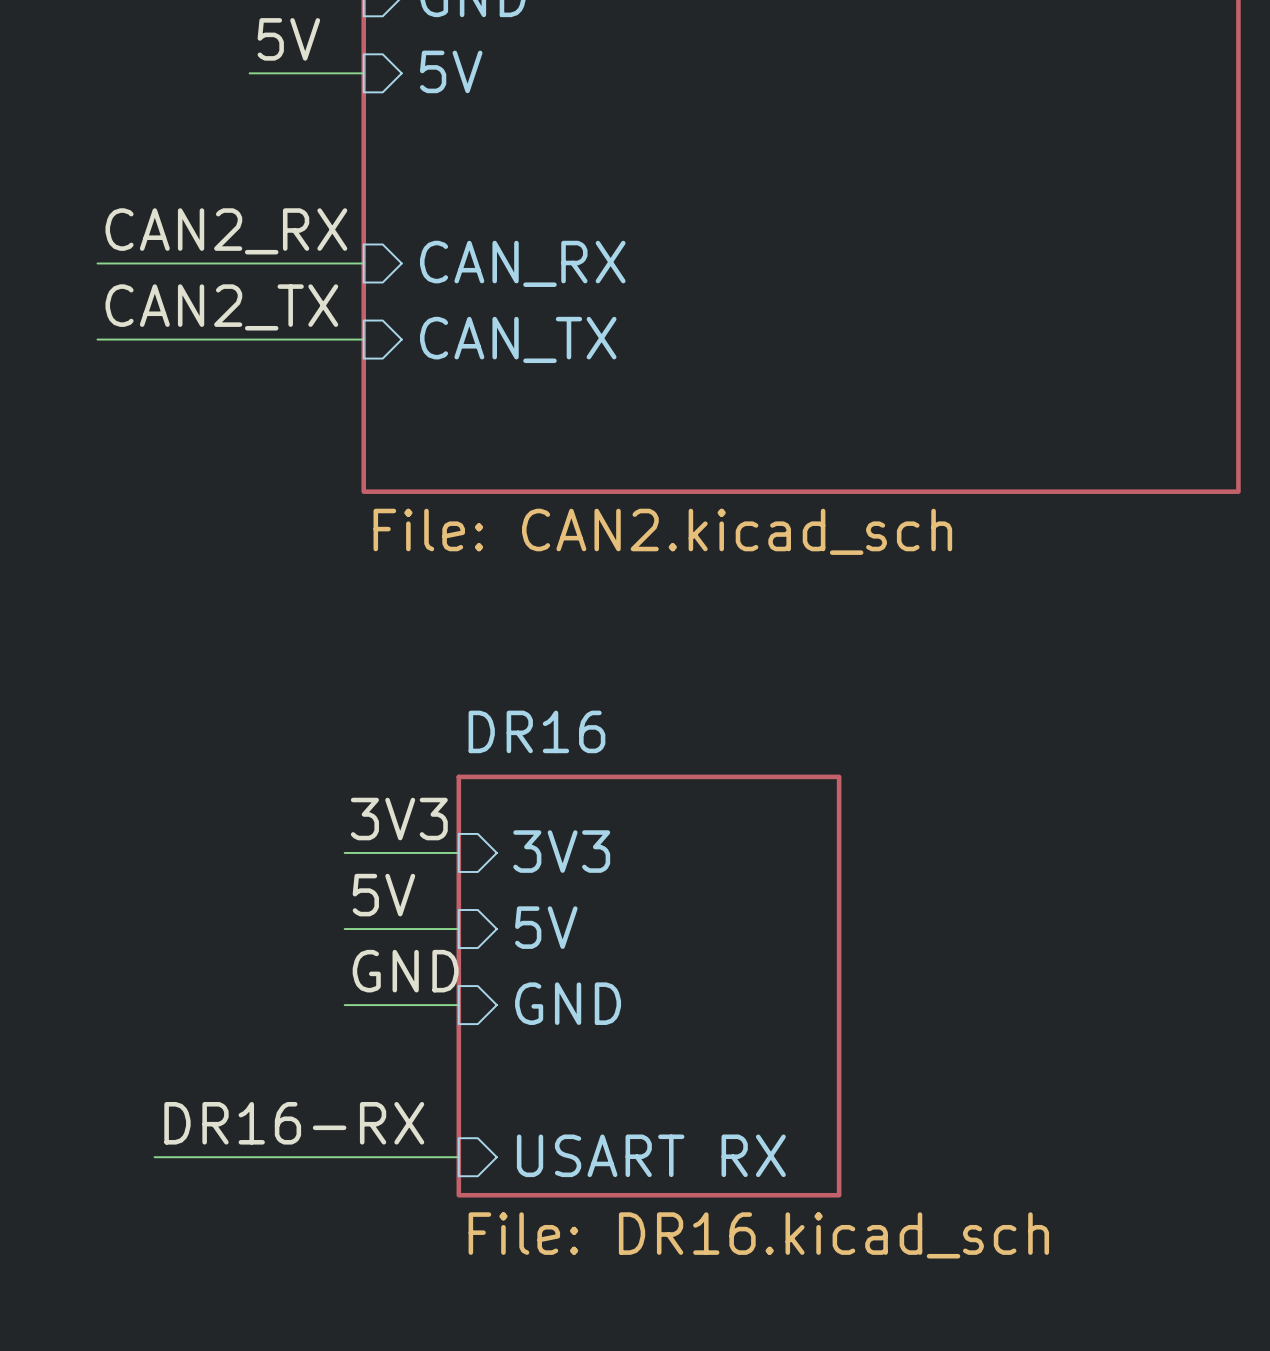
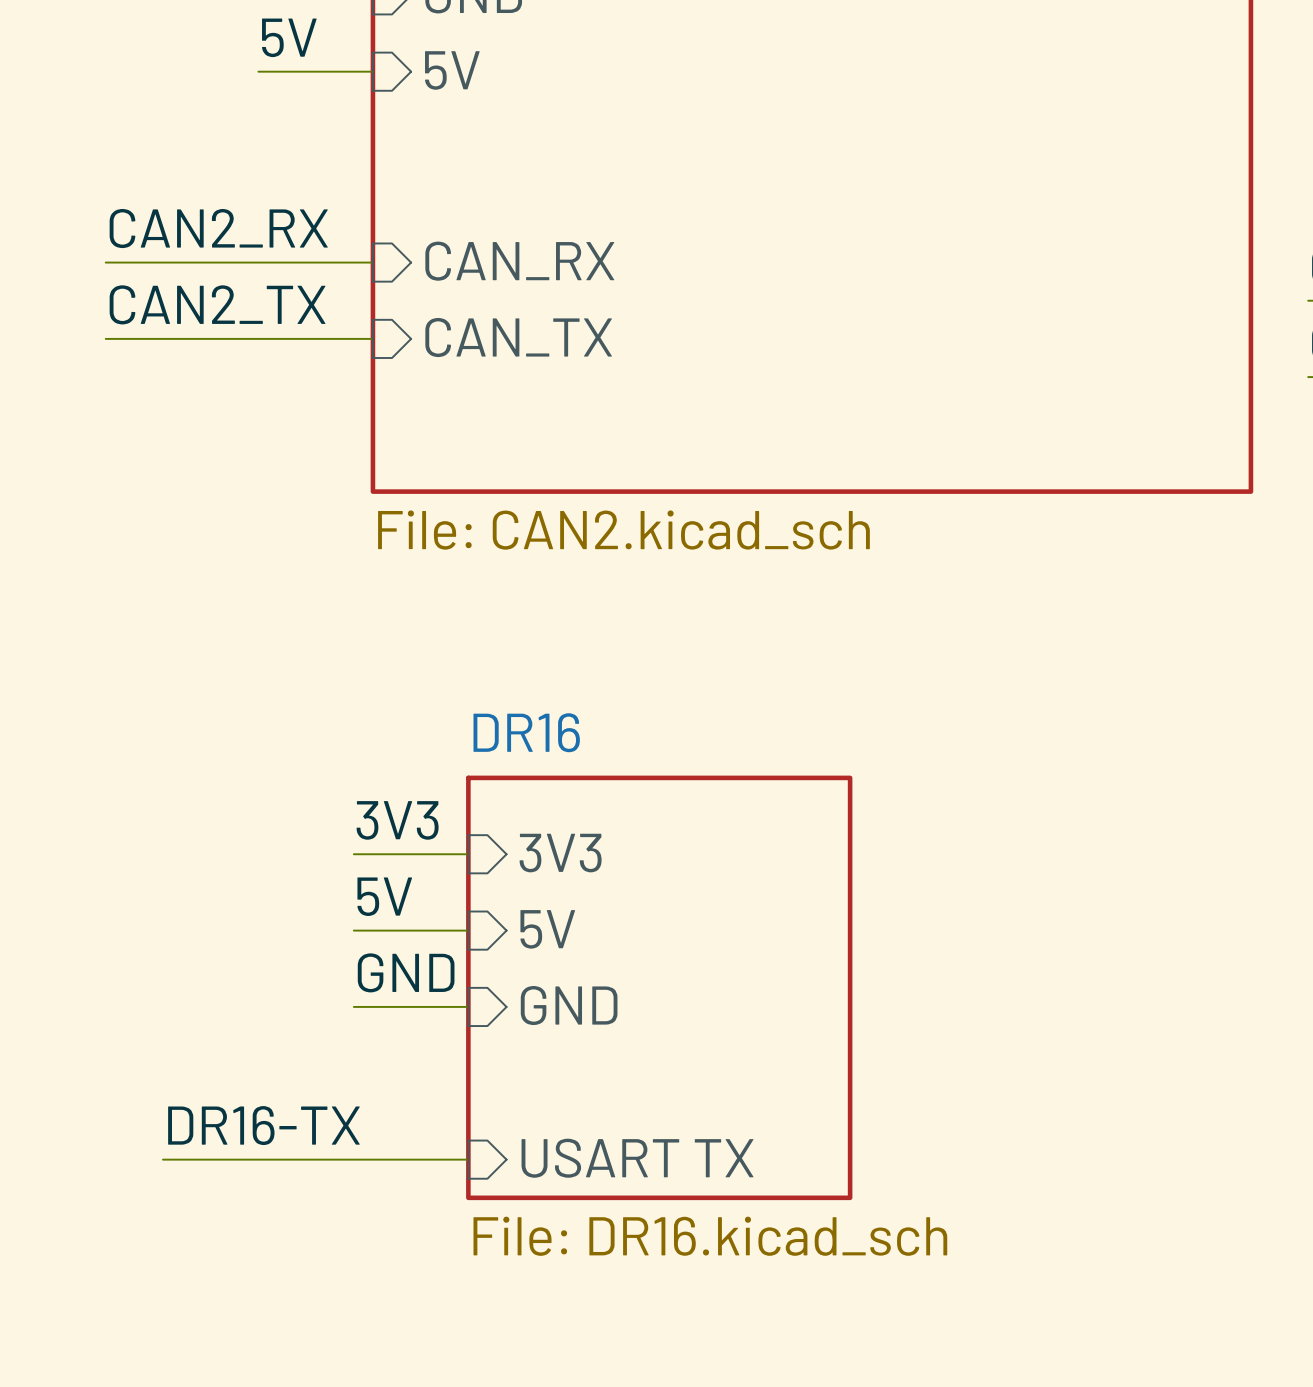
label: DR16-RX (294, 1123) -> DR16-TX (263, 1125)
sheet pin: USART RX (651, 1155) -> USART TX (637, 1158)

